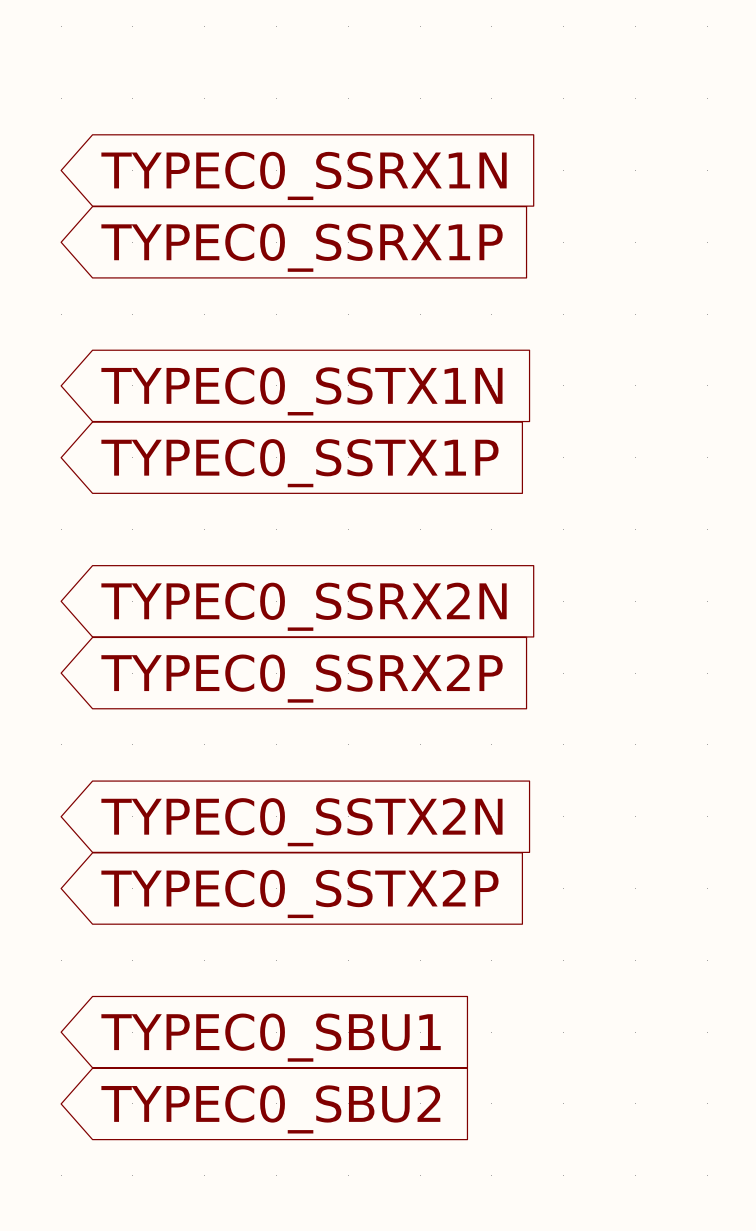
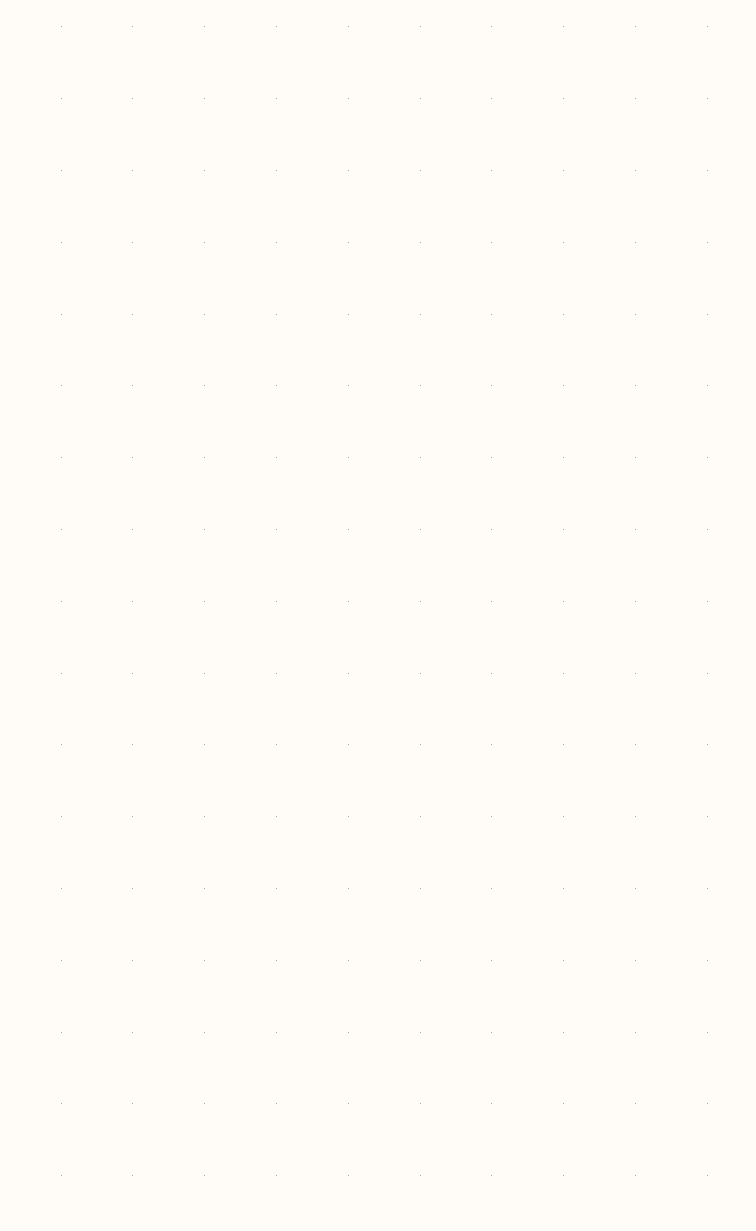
global label: TYPEC0_SSRX1N (304, 175) -> none
global label: TYPEC0_SSRX1P (302, 247) -> none
global label: TYPEC0_SSTX1N (301, 391) -> none
global label: TYPEC0_SSTX1P (299, 463) -> none
global label: TYPEC0_SSRX2N (304, 606) -> none
global label: TYPEC0_SSRX2P (302, 678) -> none
global label: TYPEC0_SSTX2N (301, 822) -> none
global label: TYPEC0_SSTX2P (299, 894) -> none
global label: TYPEC0_SBU1 (271, 1037) -> none
global label: TYPEC0_SBU2 (270, 1109) -> none

